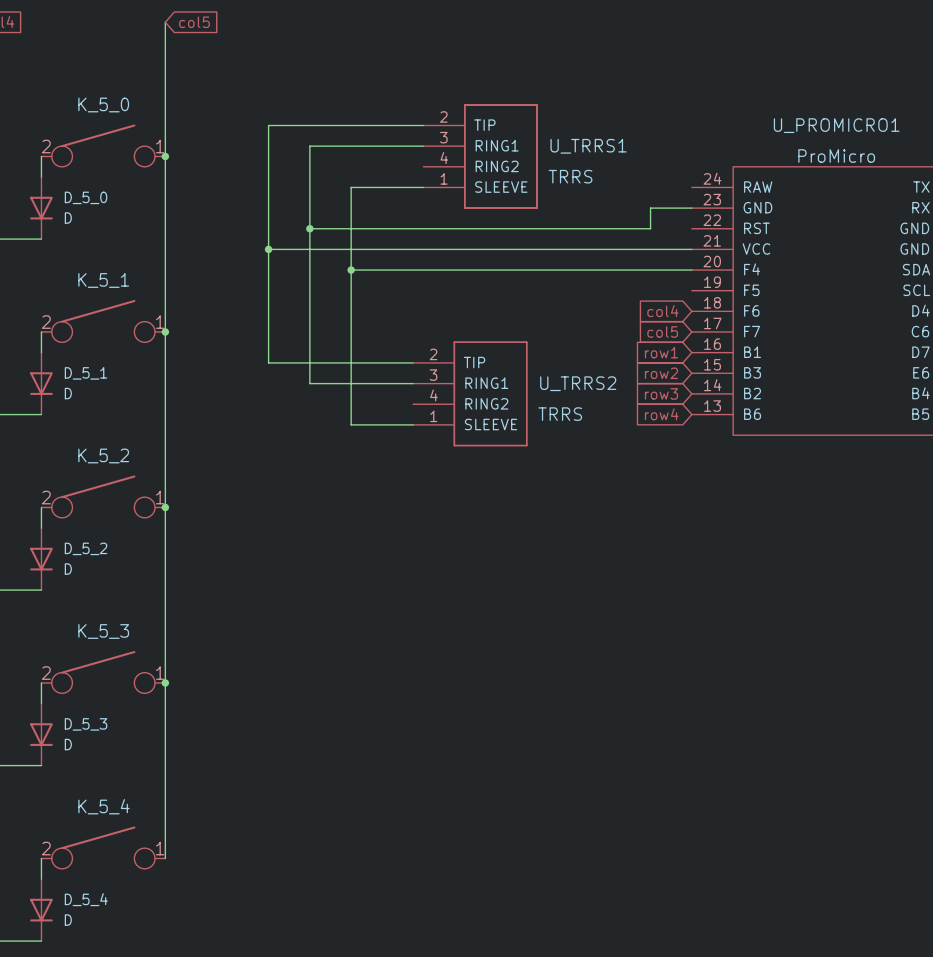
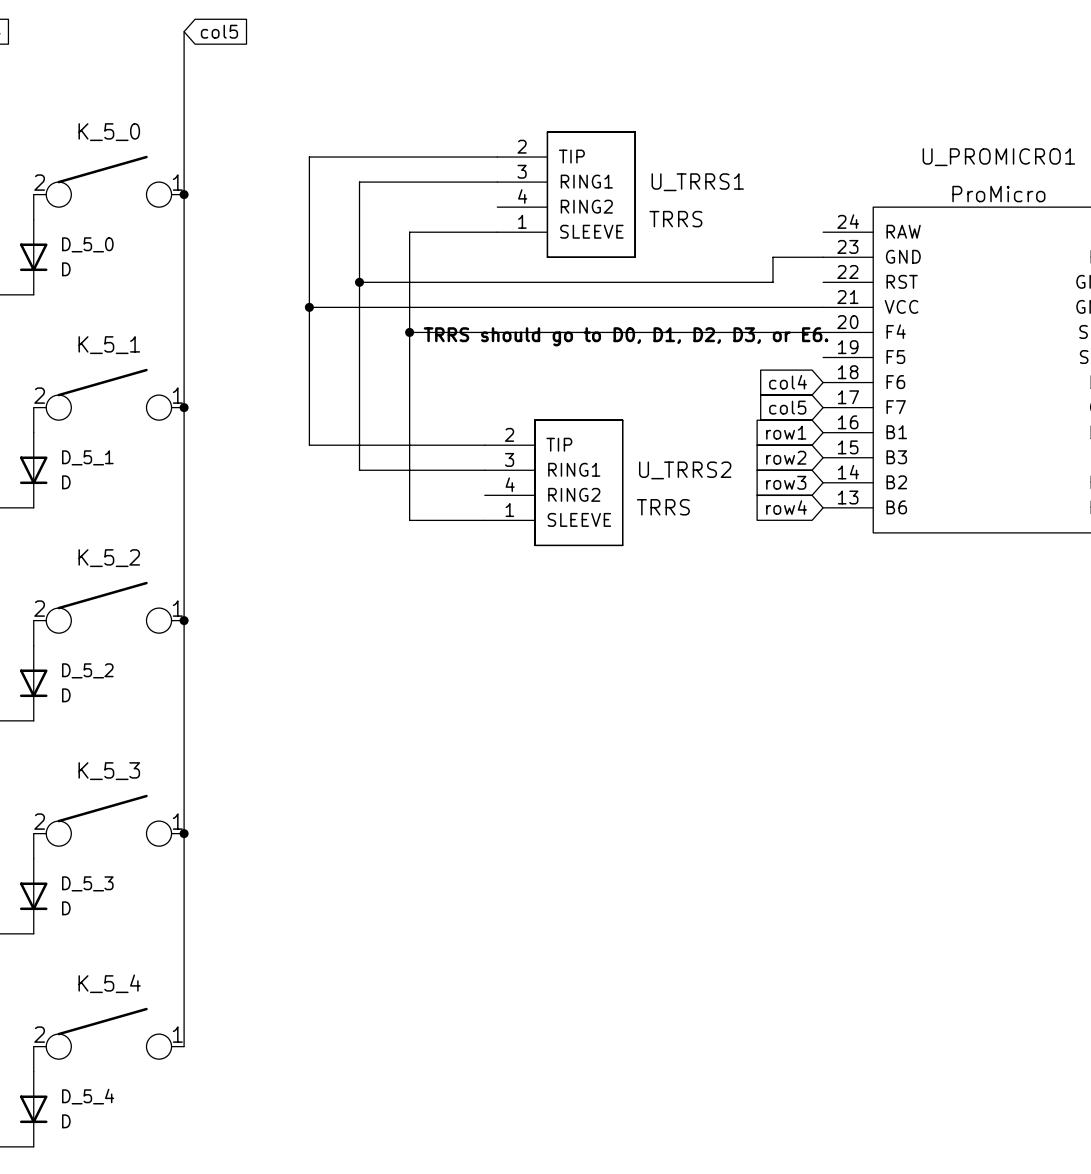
text: none -> TRRS should go to D0, D1, D2, D3, or E6. (626, 336)

